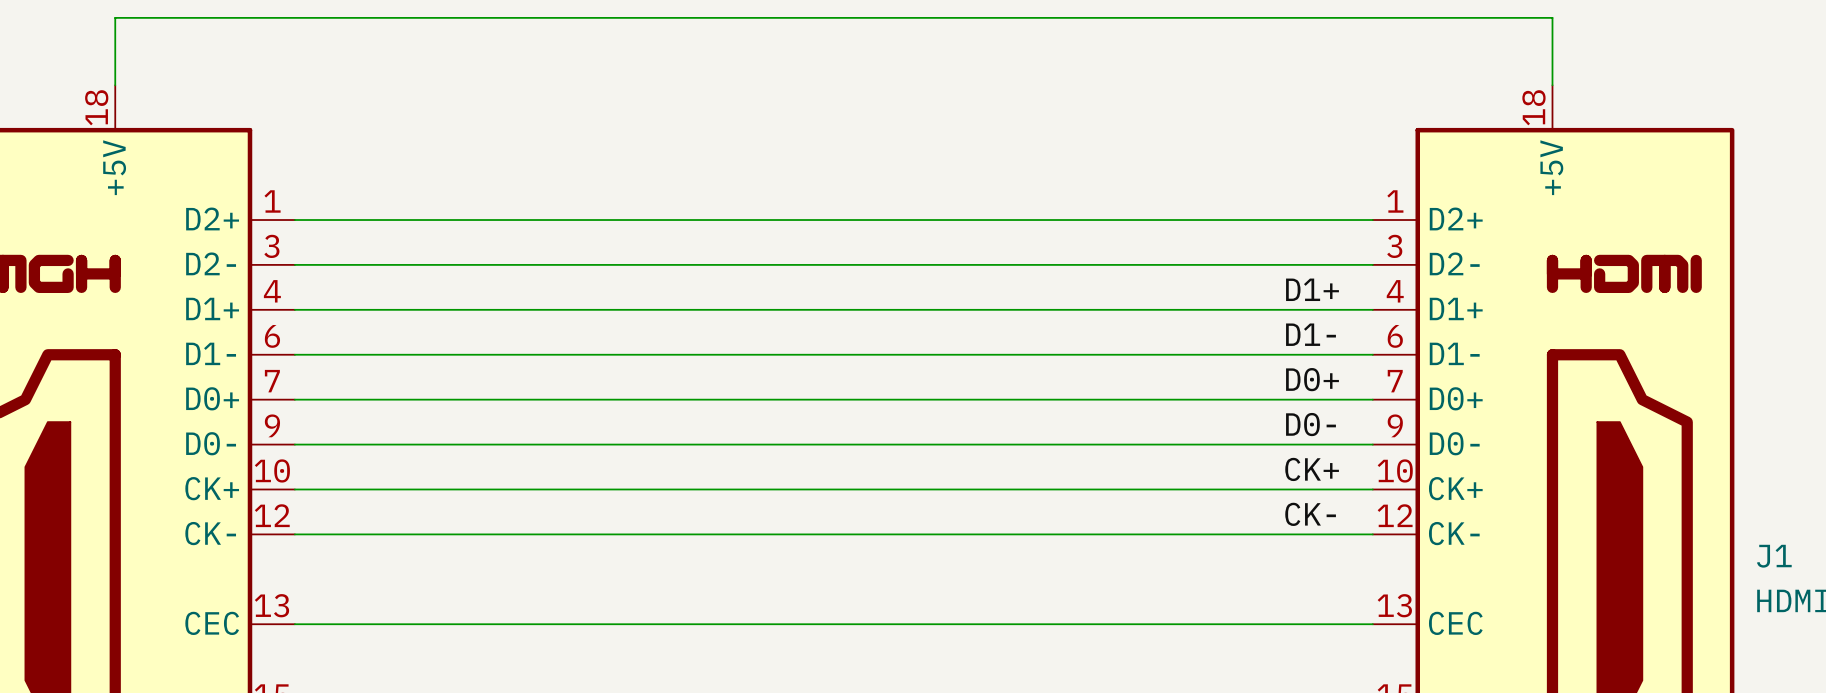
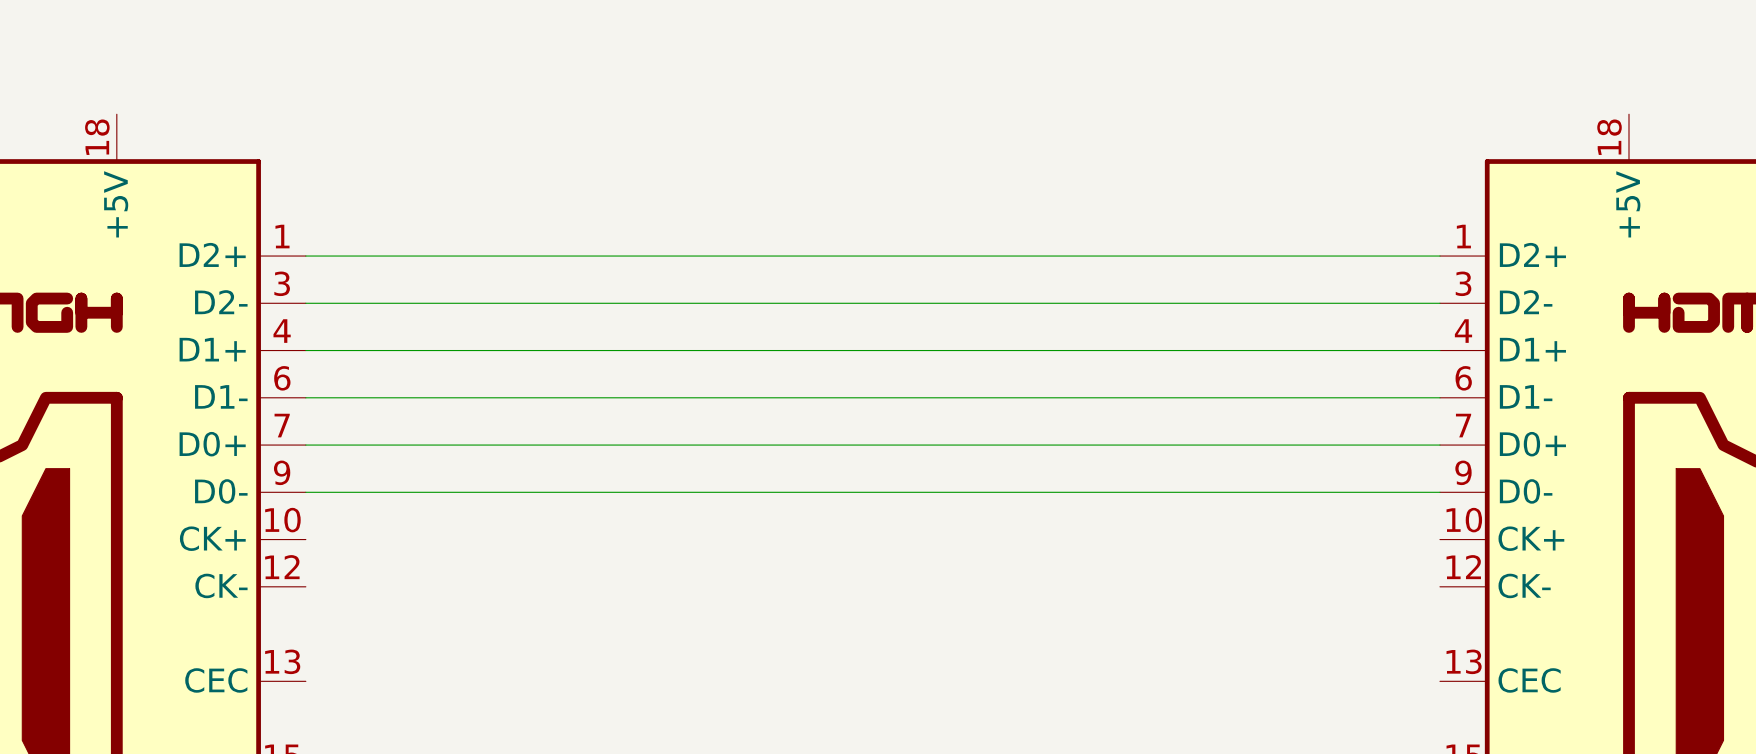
wire: (115, 85) (115, 17) (1552, 17) (1552, 85) -> none
label: D1+ (1312, 289) -> none
label: D1- (1311, 334) -> none
label: D0+ (1312, 379) -> none
label: D0- (1310, 424) -> none
label: CK+ (1312, 469) -> none
wire: (294, 489) (1372, 489) -> none
label: CK- (1310, 514) -> none
wire: (294, 534) (1372, 534) -> none
wire: (294, 624) (1372, 624) -> none

